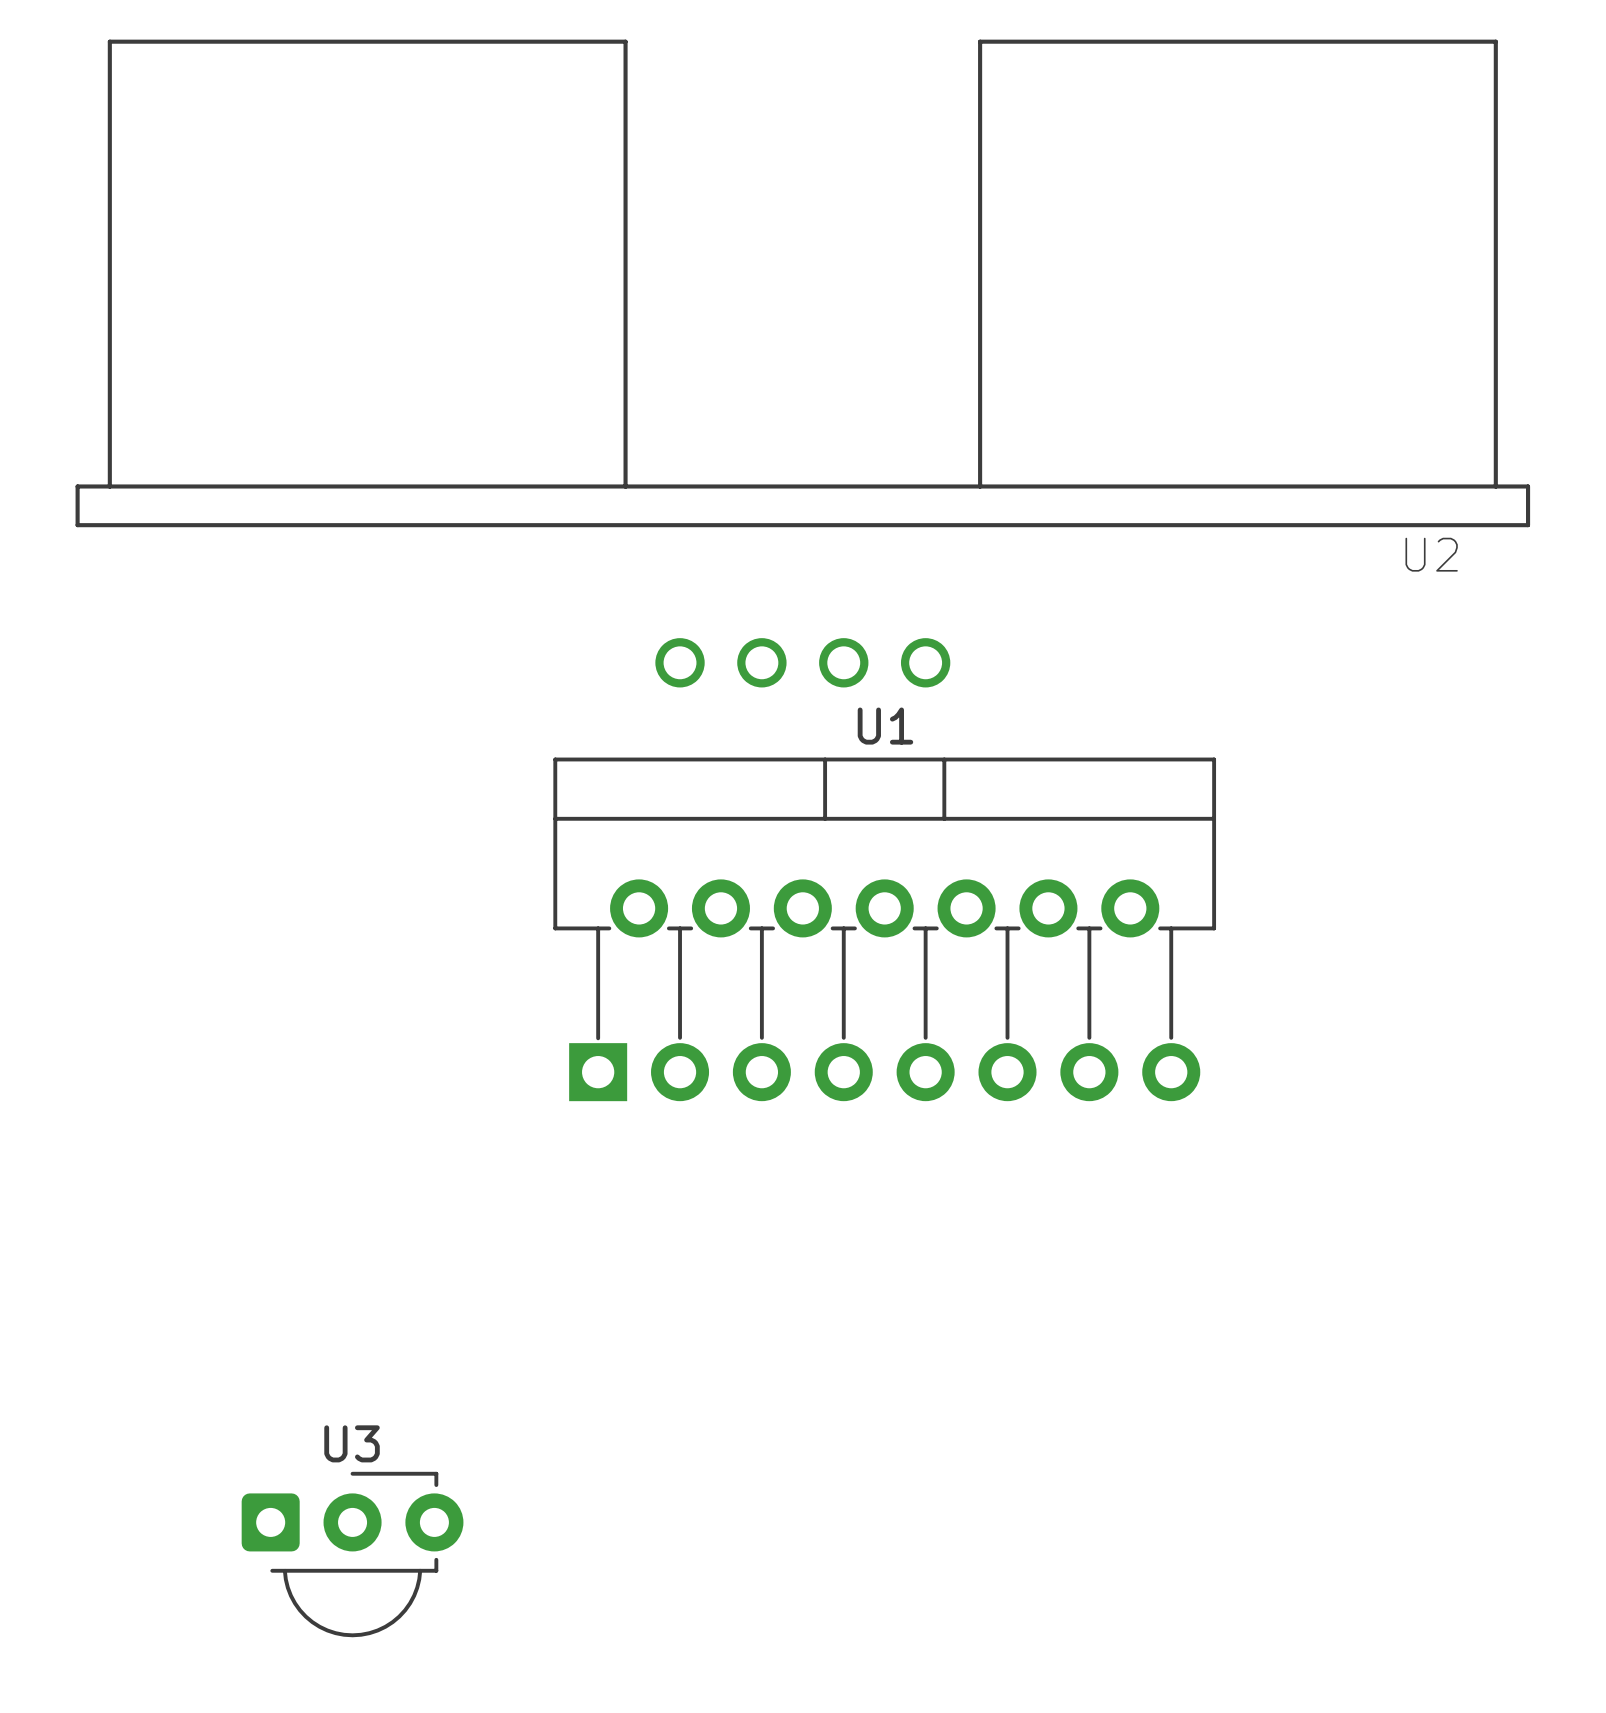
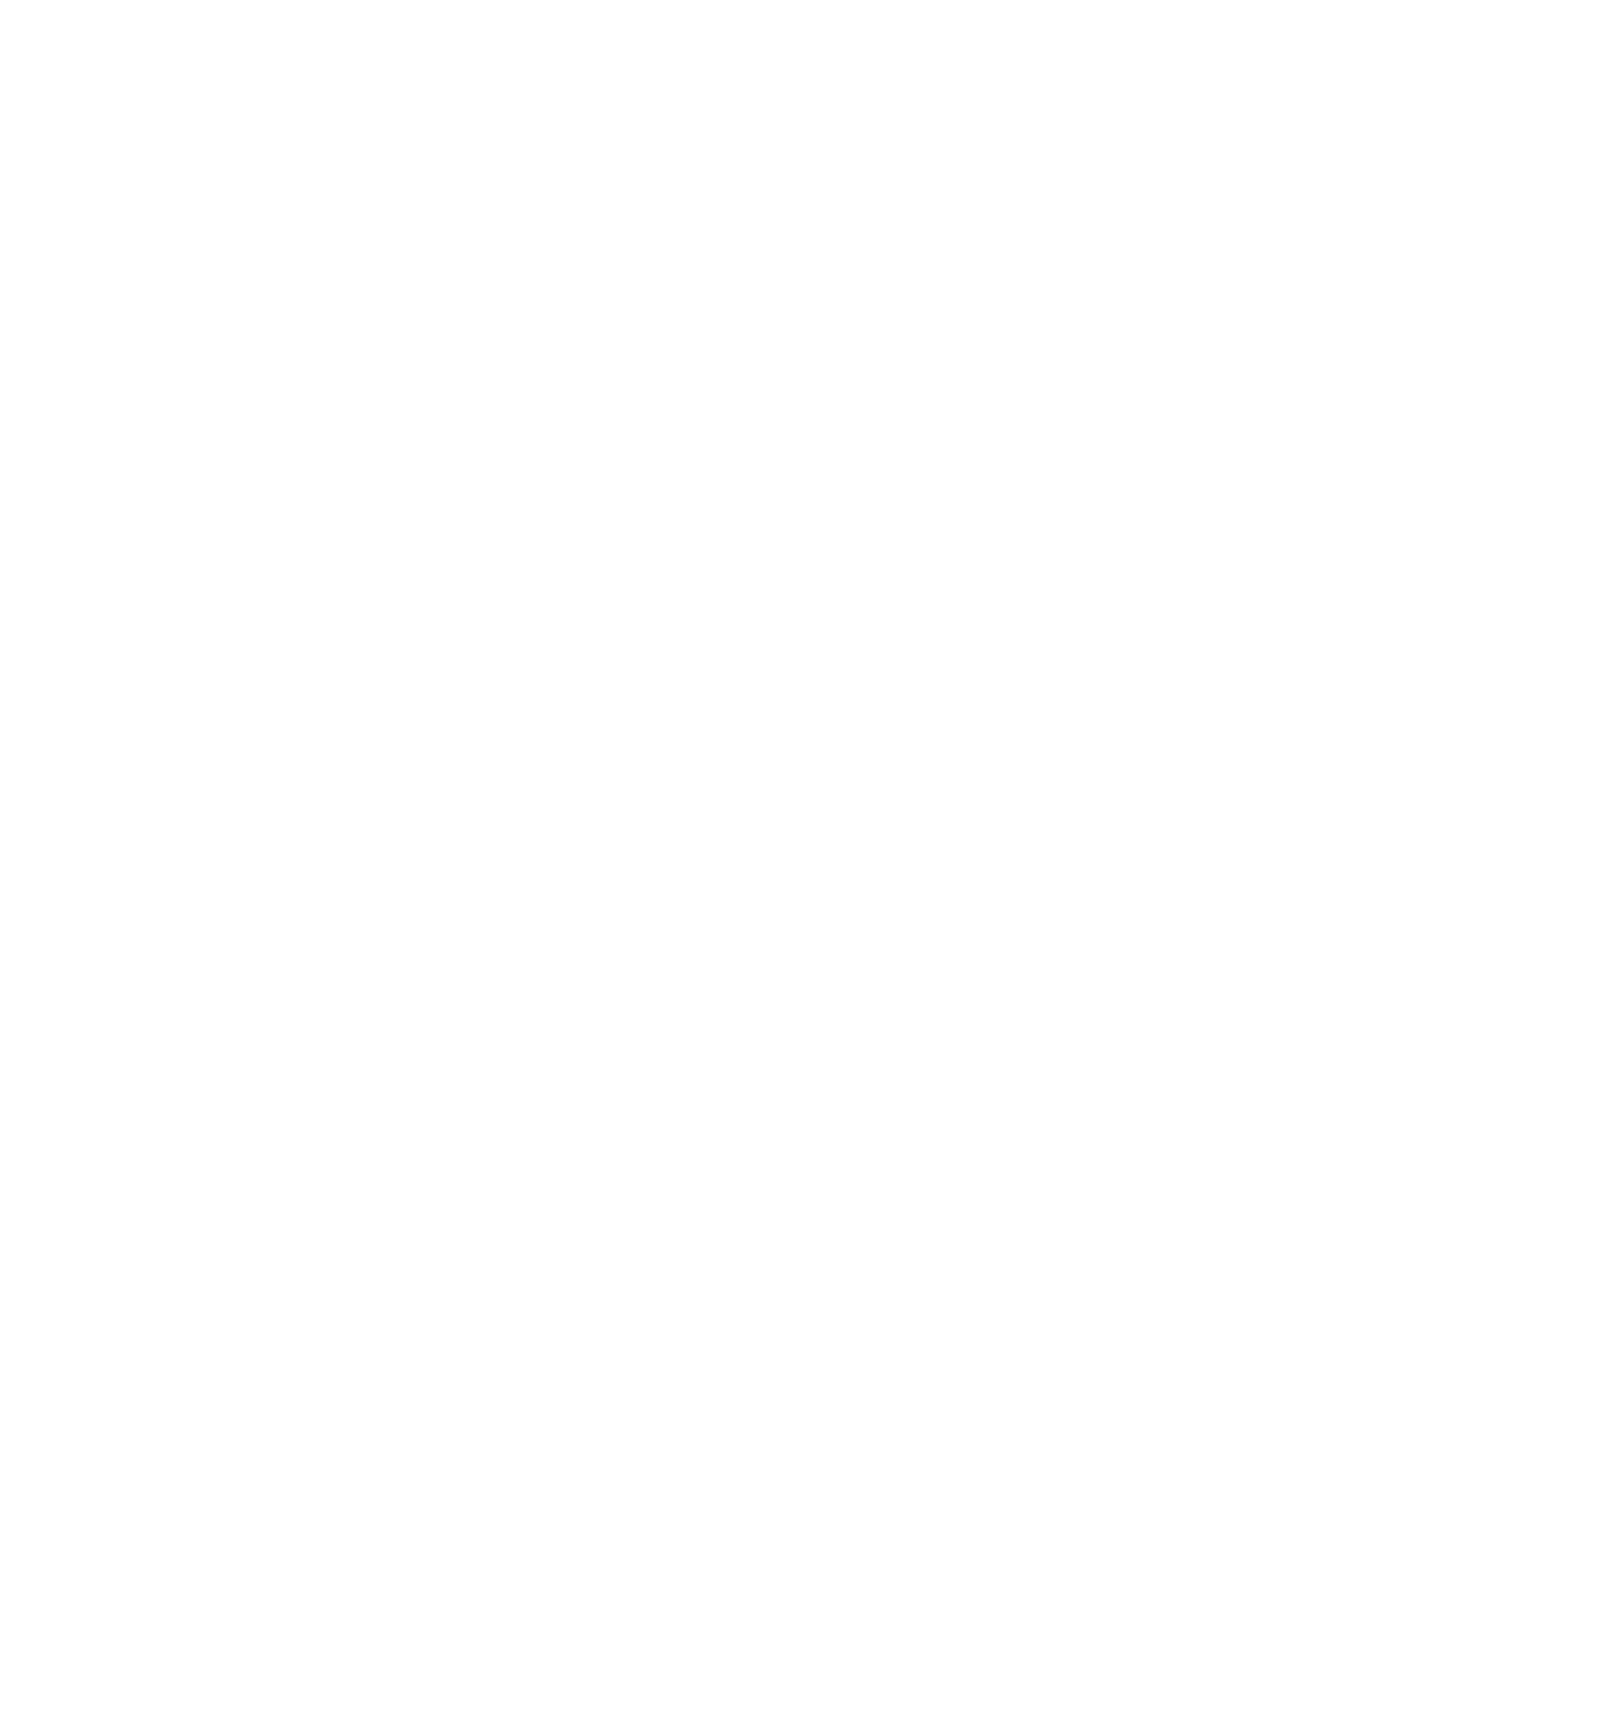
U2: (802, 363) -> none
U1: (884, 929) -> none
U3: (352, 1554) -> none

